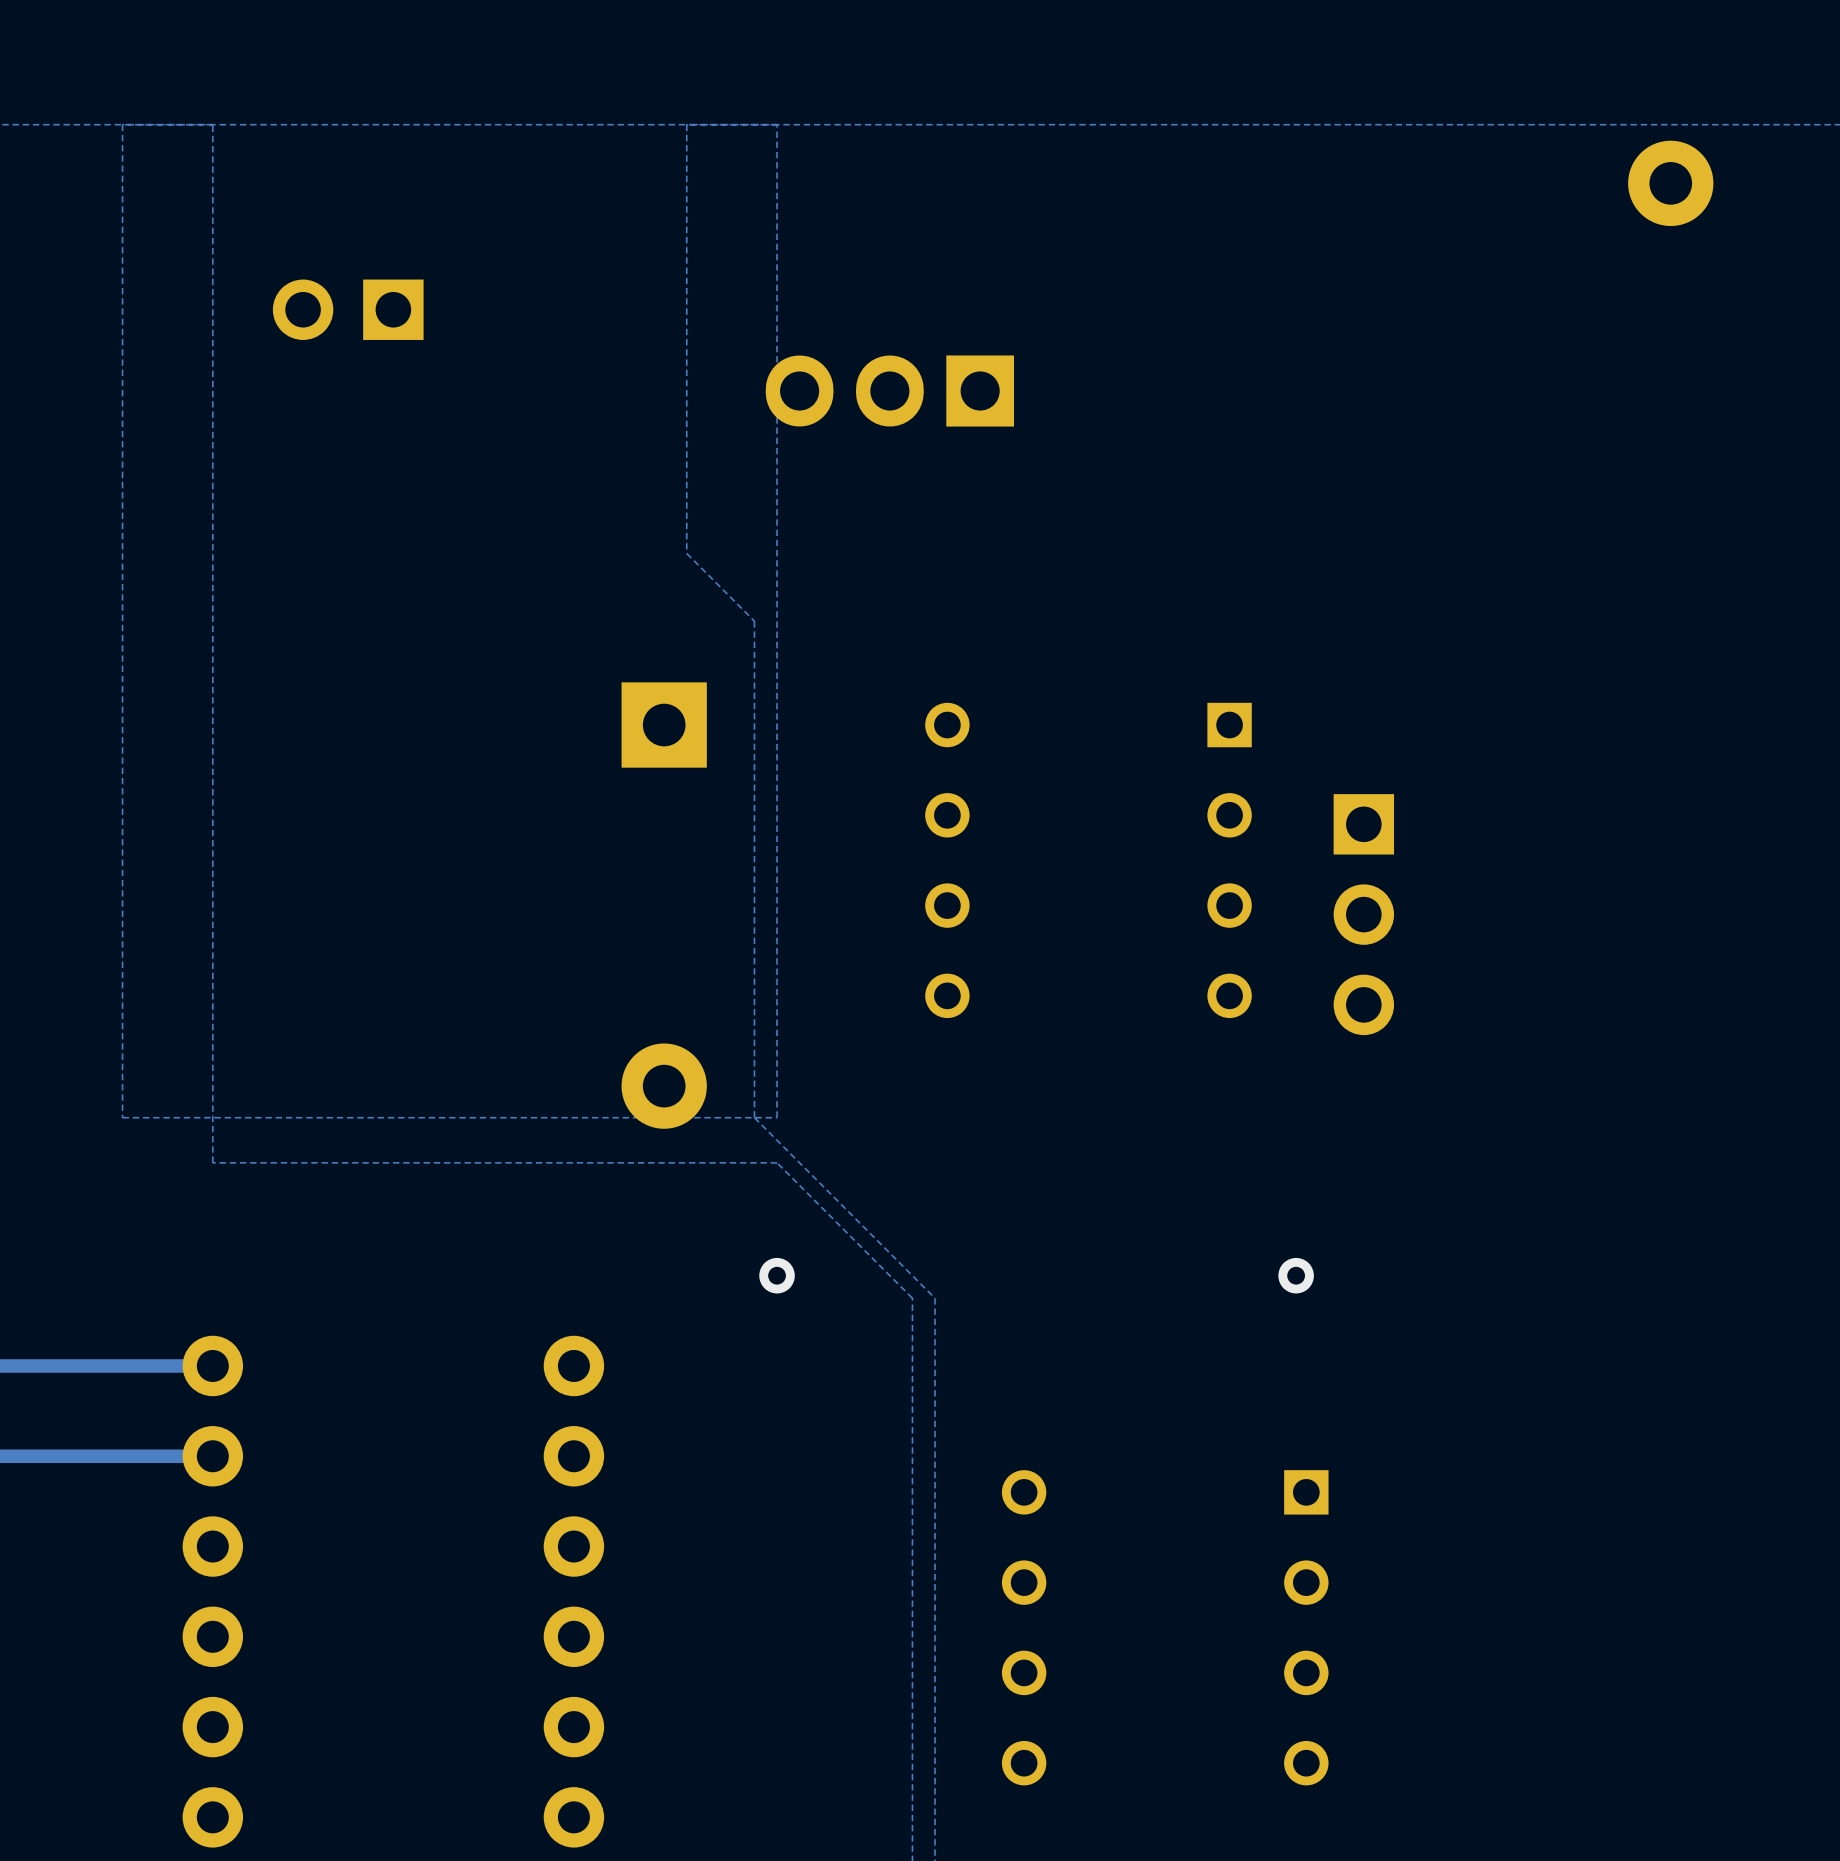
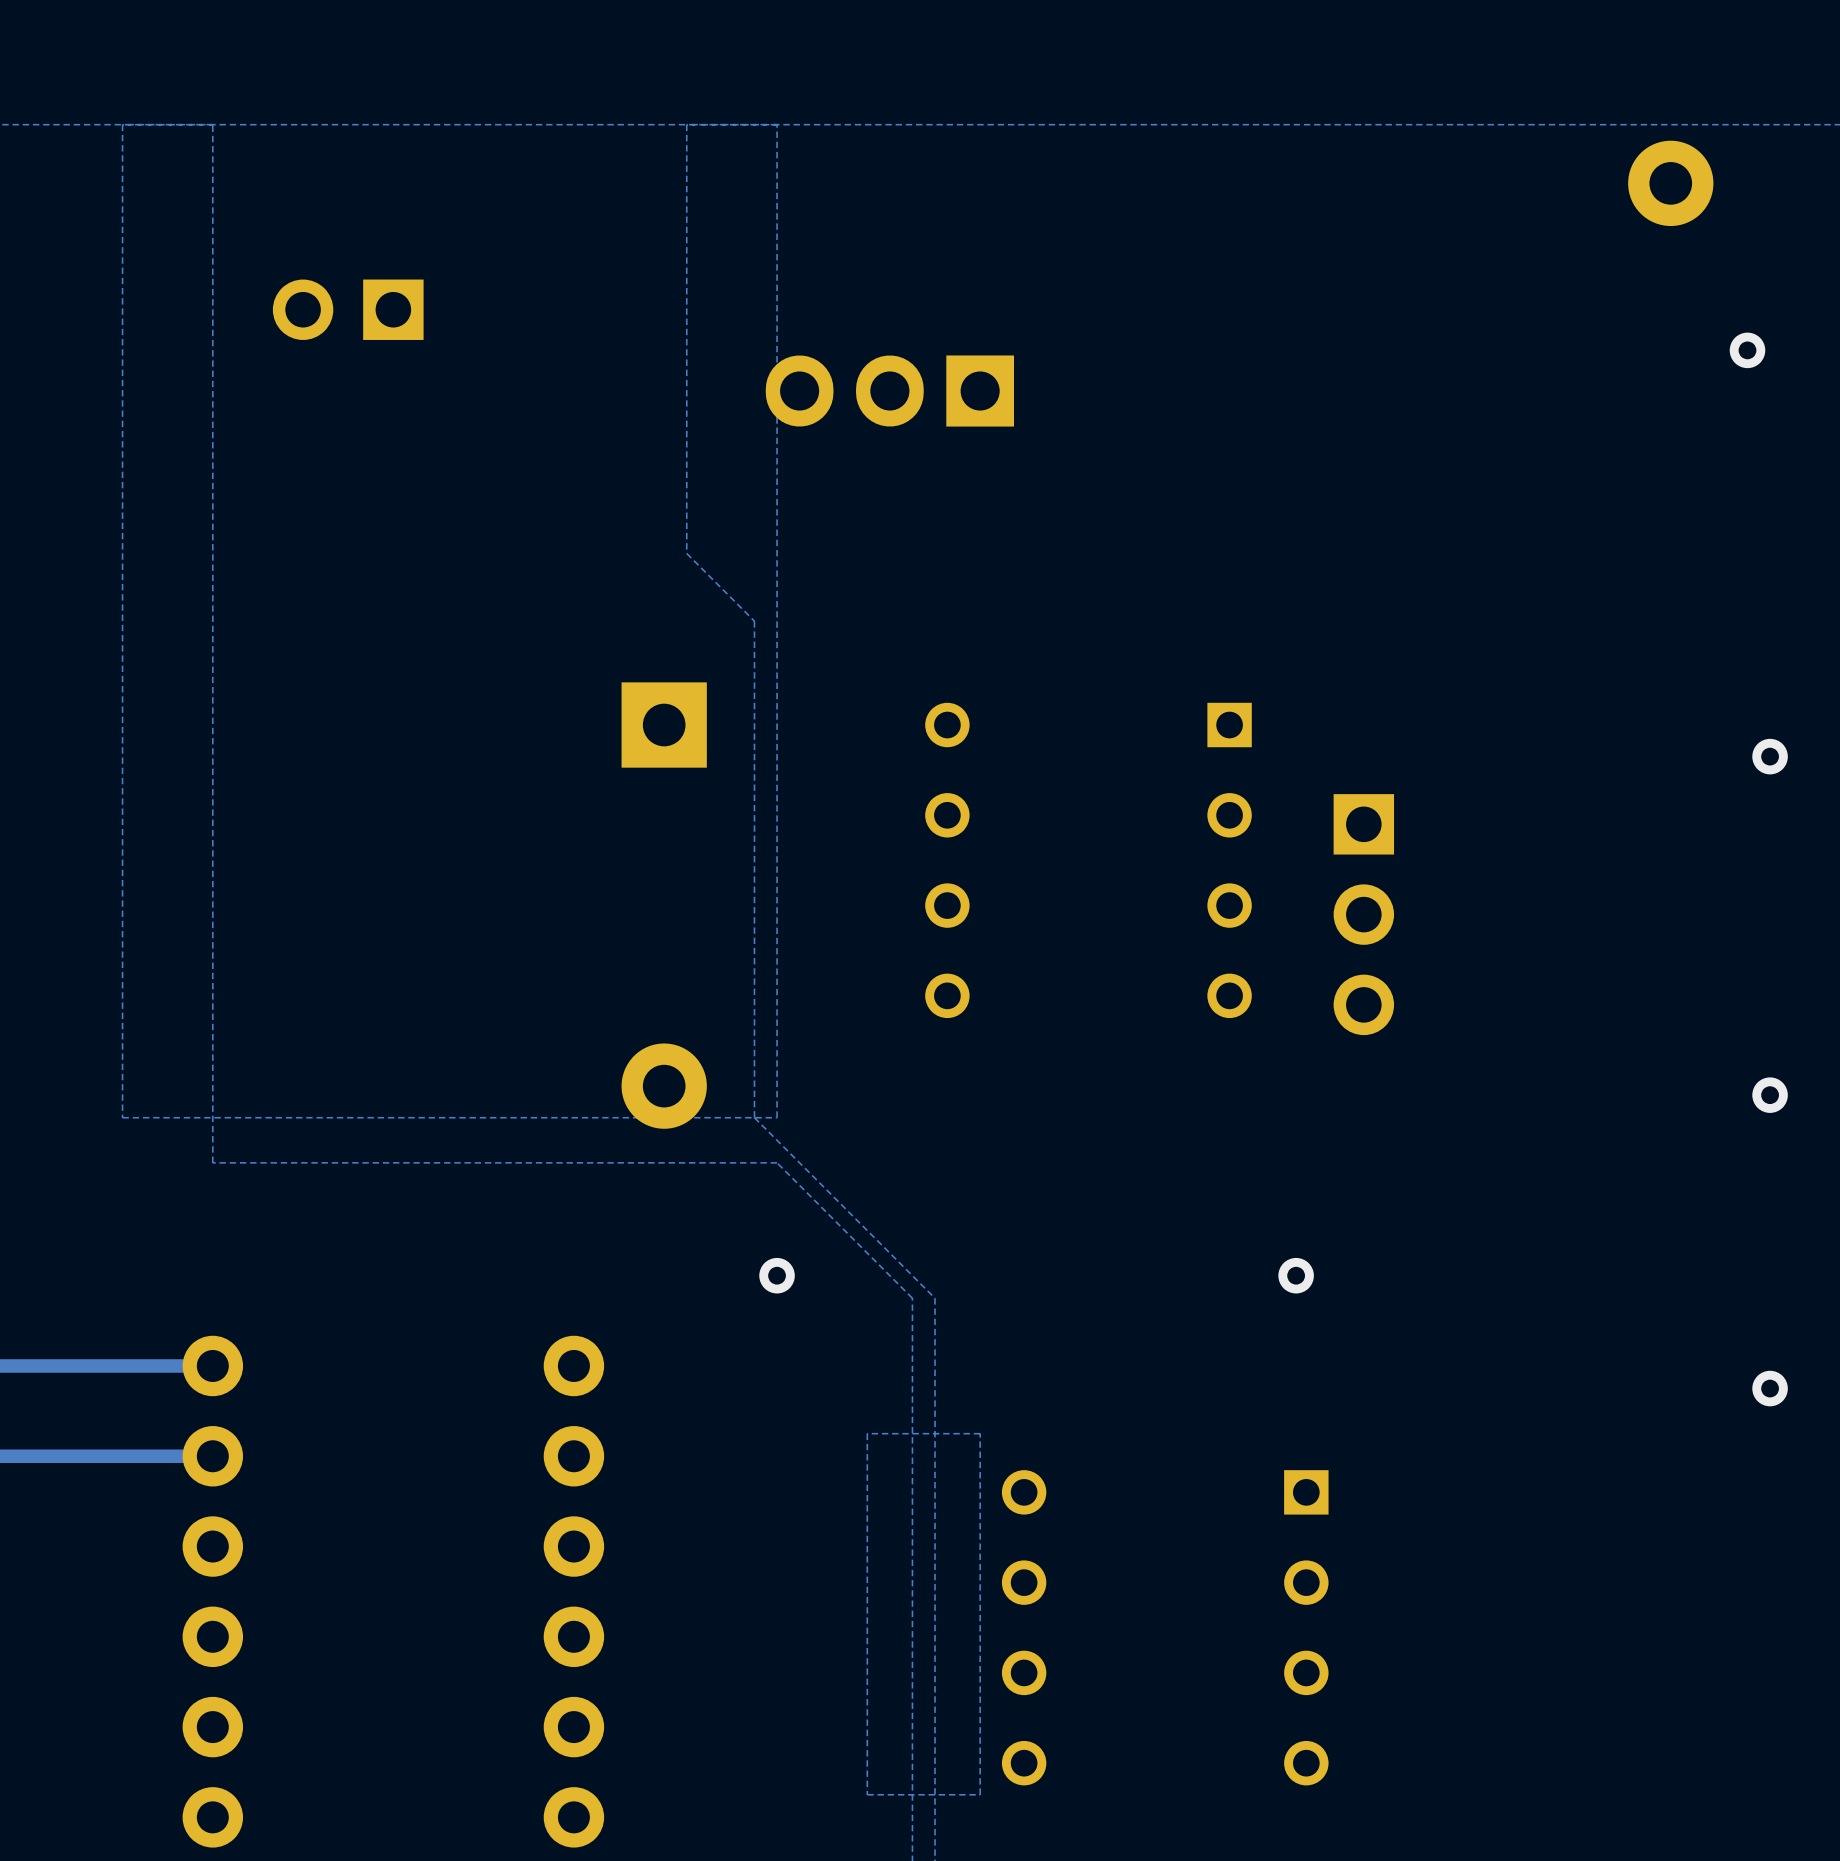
via: none -> (1747, 350)
via: none -> (1770, 756)
via: none -> (1770, 1095)
via: none -> (1770, 1388)
zone outline: none -> (980, 1433) (980, 1794) (867, 1794) (867, 1433) (980, 1433)

